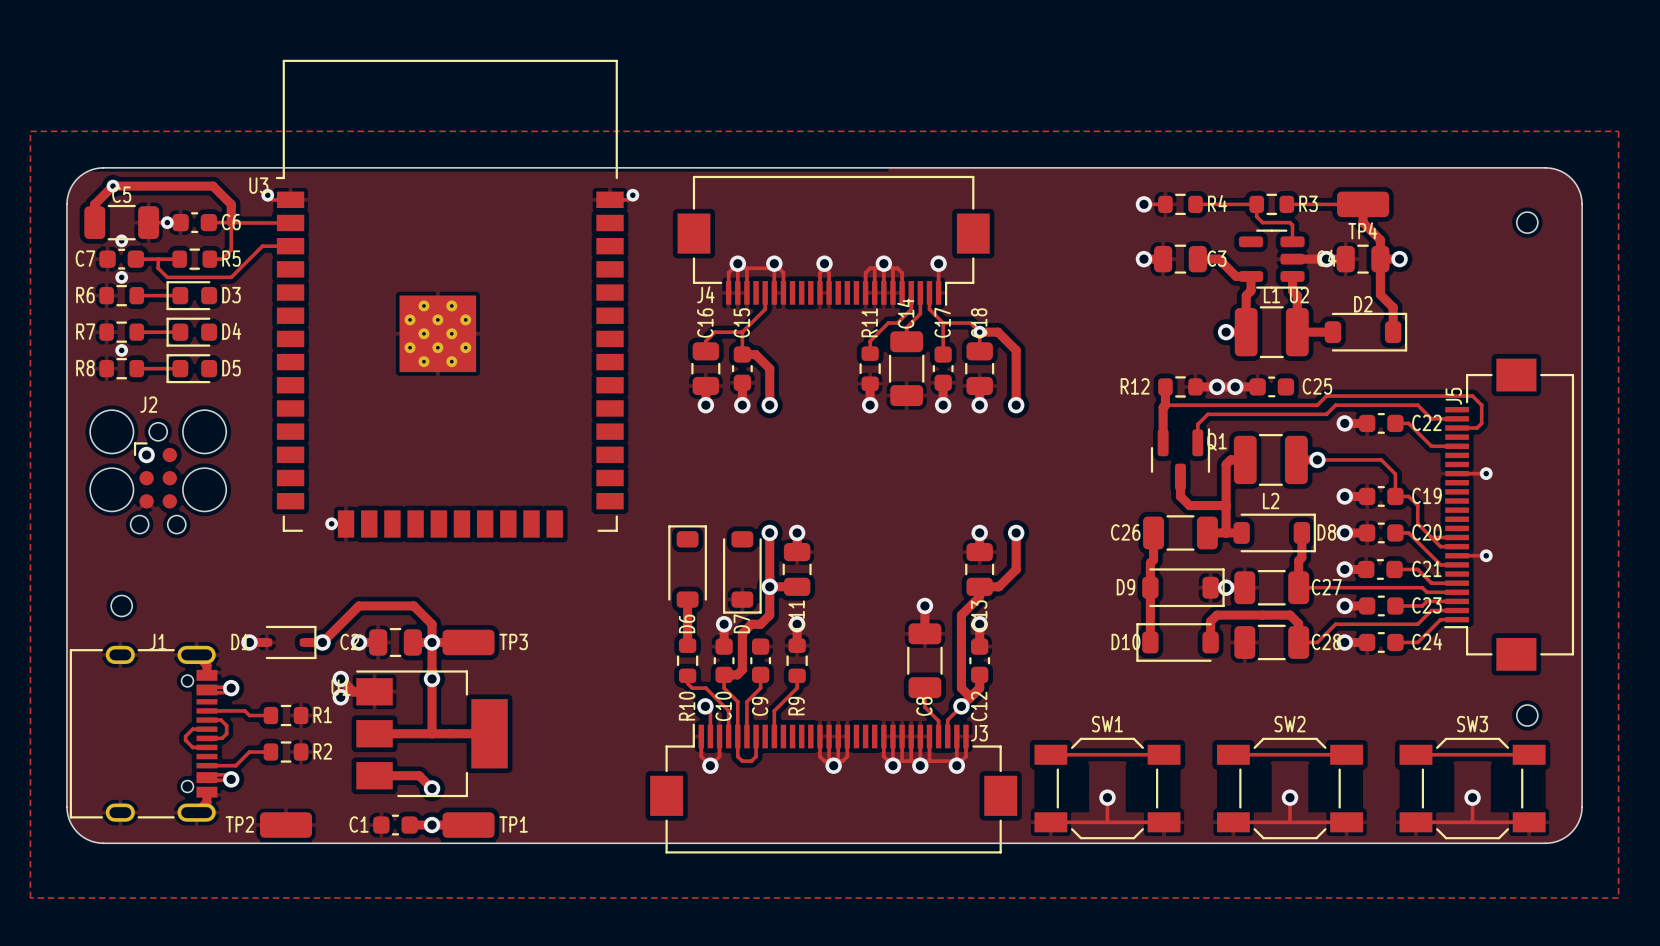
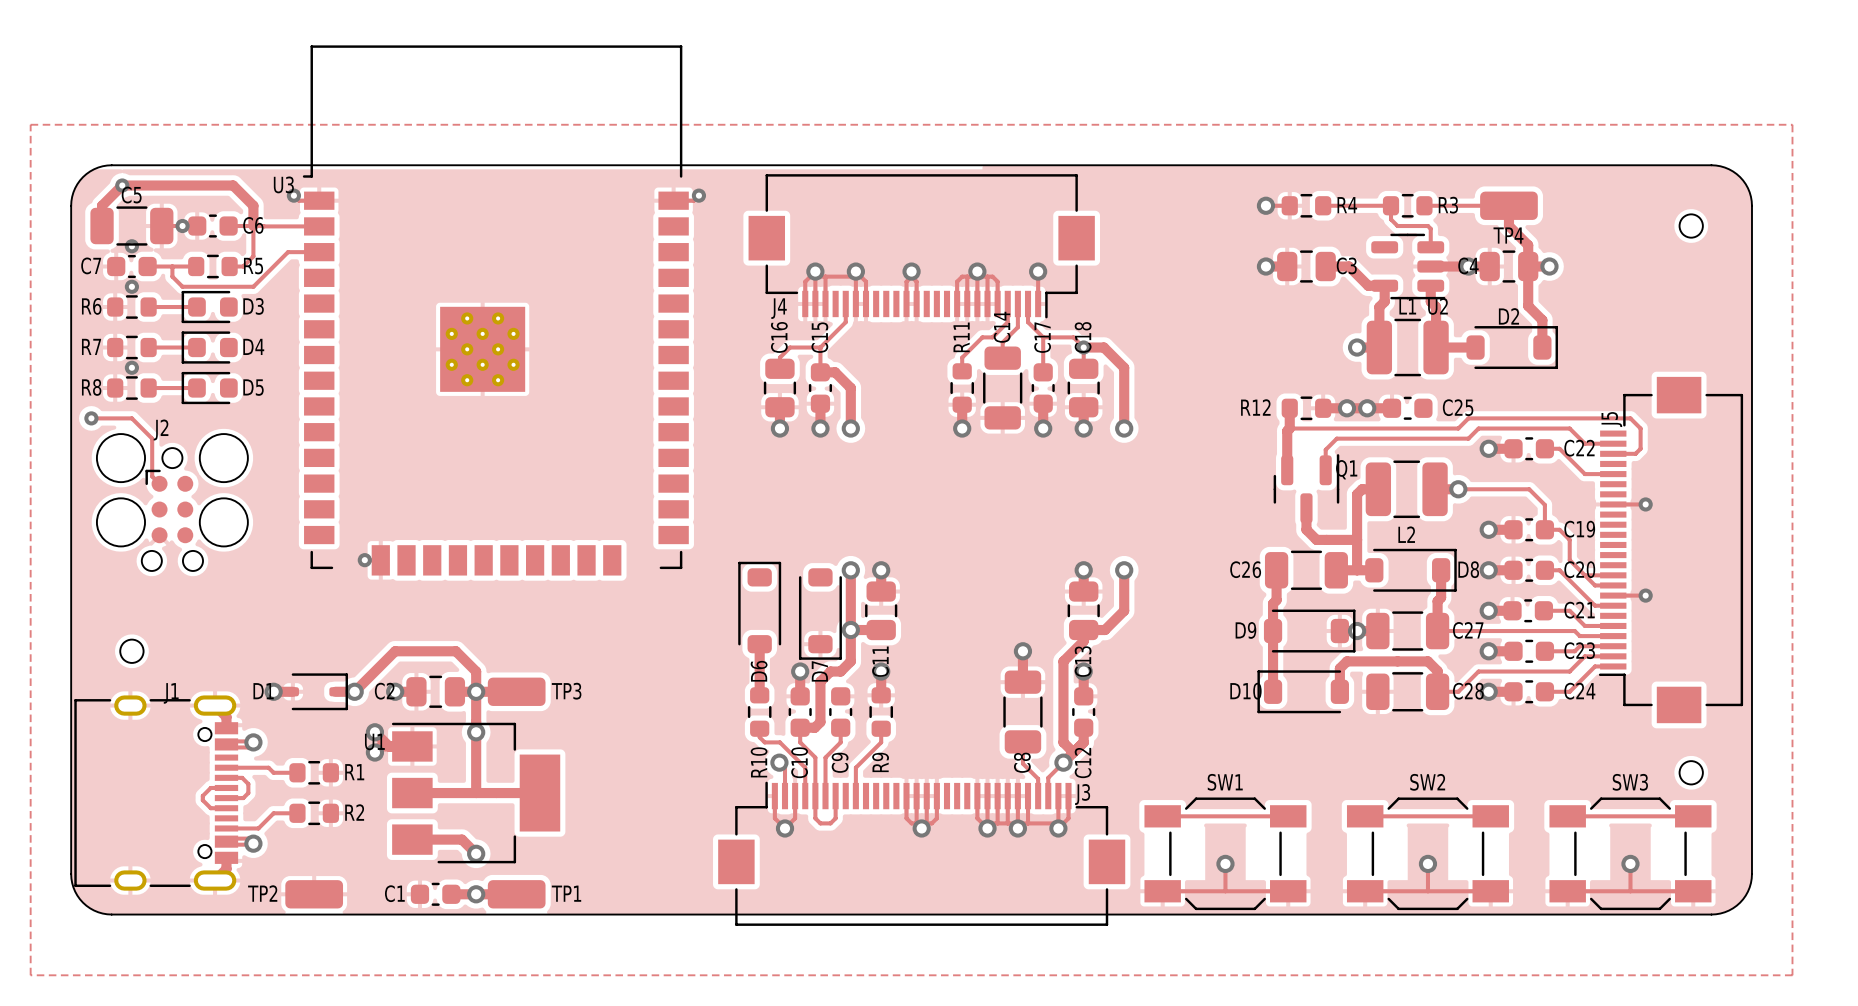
track: none -> (91, 418) (131, 418) (152, 438) (152, 476) (159, 483)
via: none -> (91, 418)
via: (146, 455) -> none

